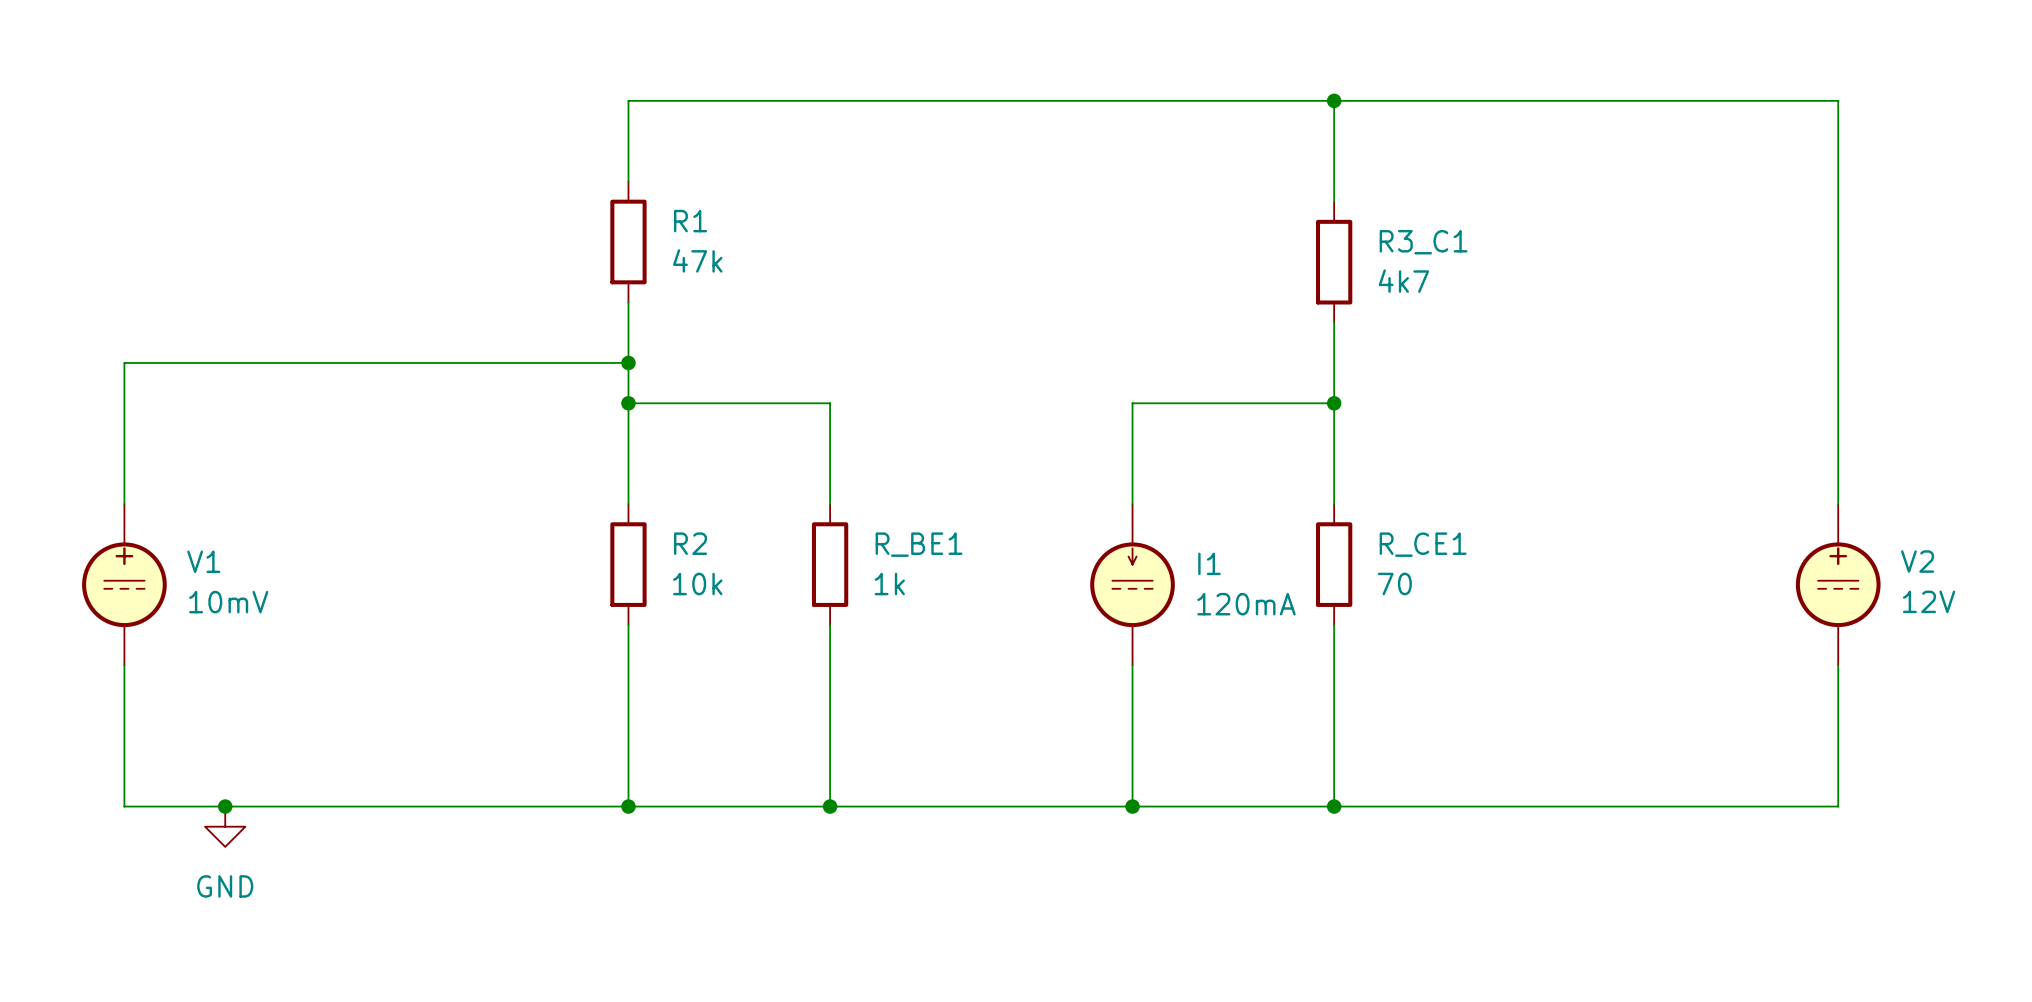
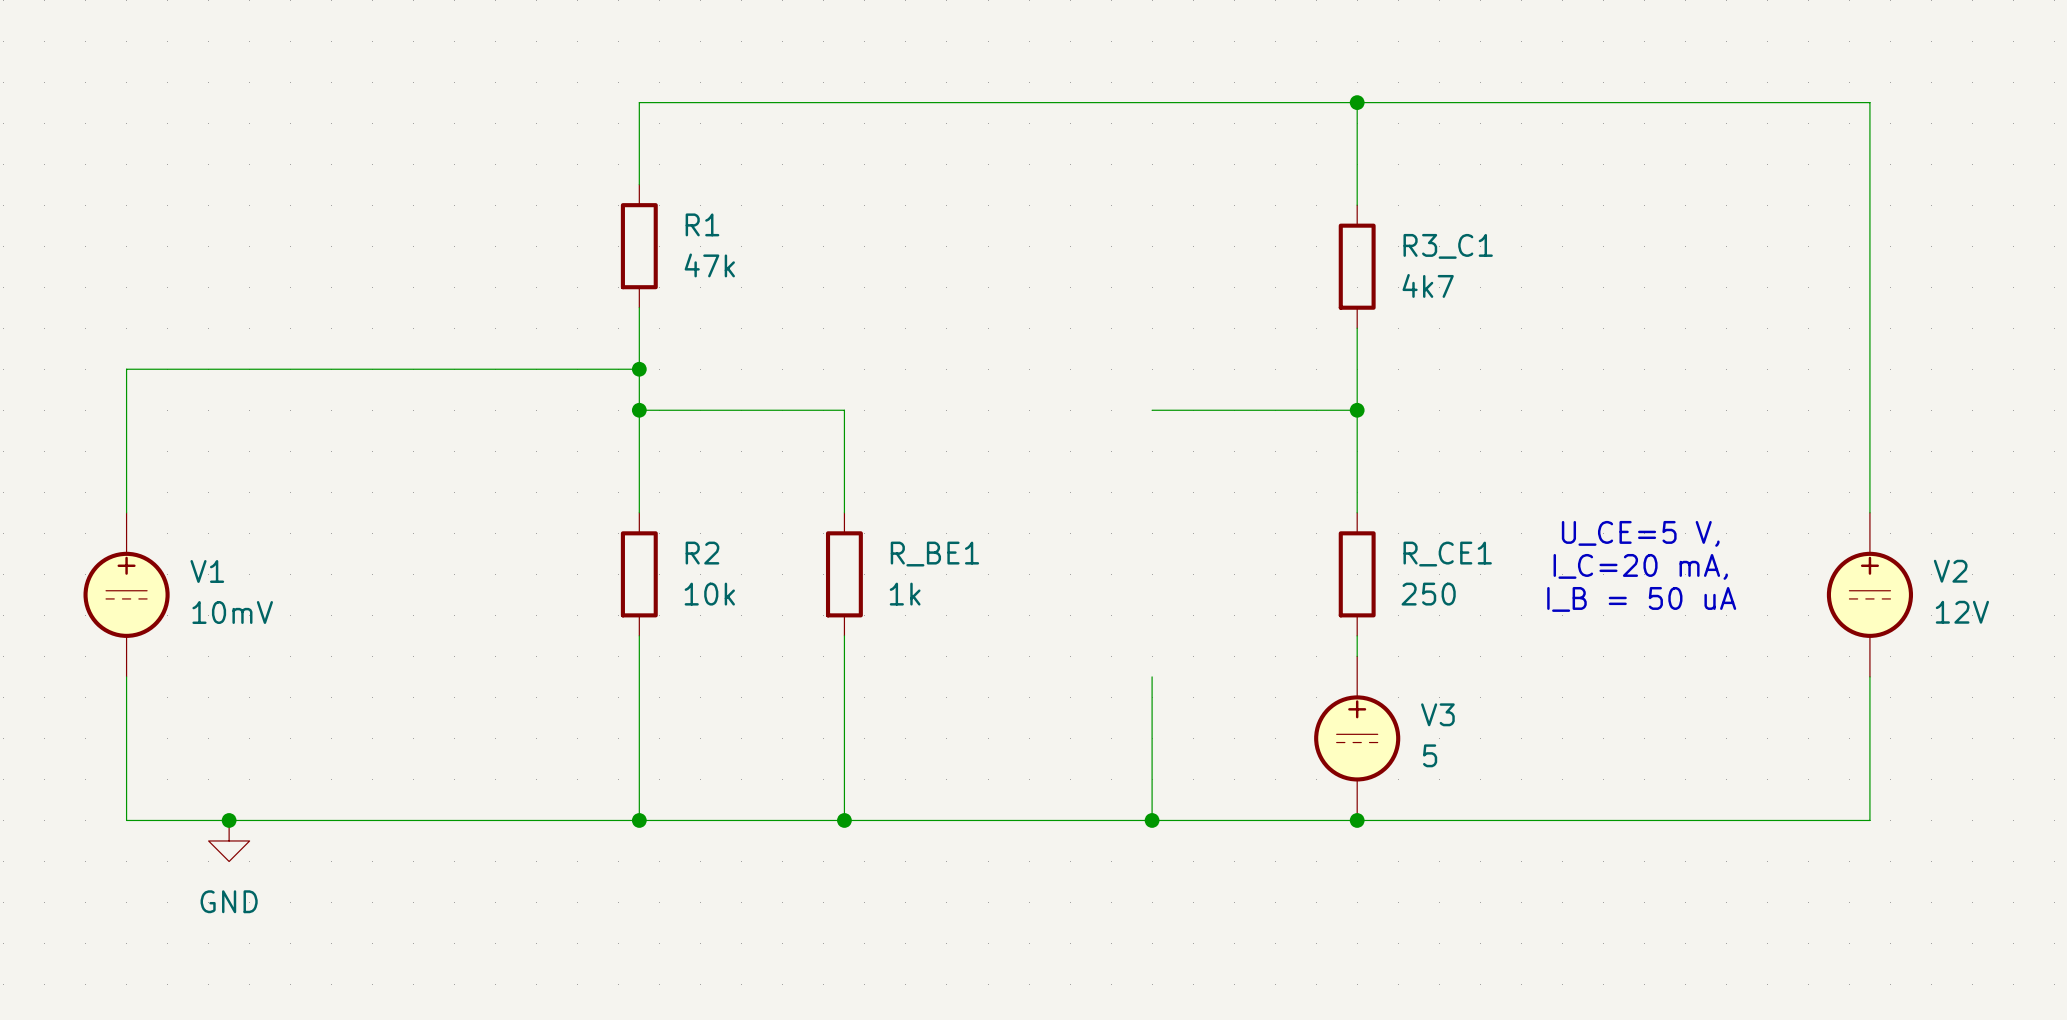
wire: (1132, 403) (1132, 504) -> none
text: none -> U_CE=5 V, (1640, 533)
text: none -> I_C=20 mA, (1640, 566)
I1: 120mA (1132, 584) -> none
R_CE1 value: 70 (1394, 584) -> 250 (1428, 594)
text: none -> I_B = 50 uA (1641, 599)
V3: none -> 5 (1357, 738)

